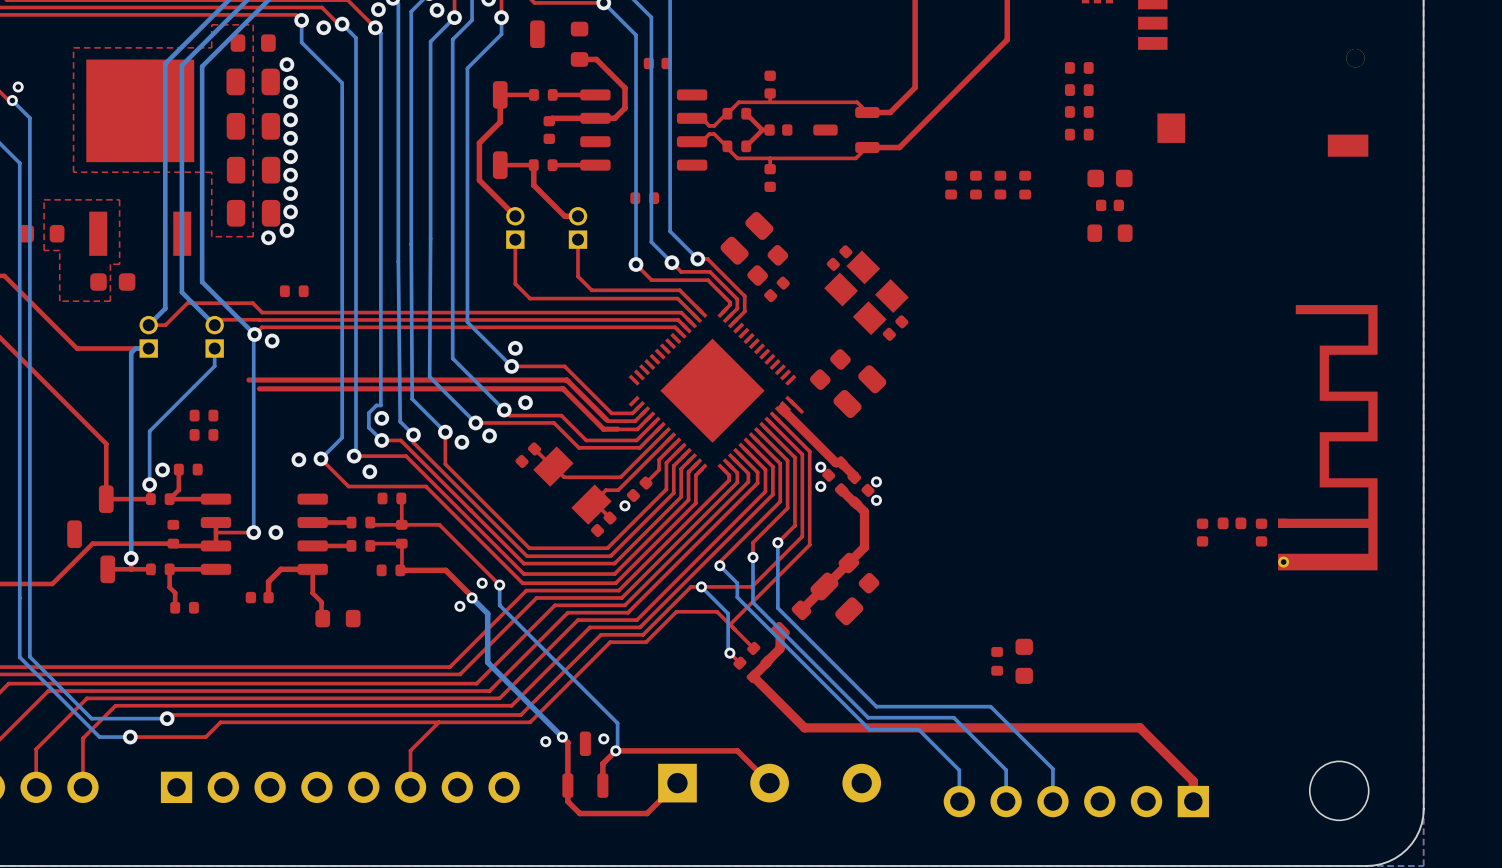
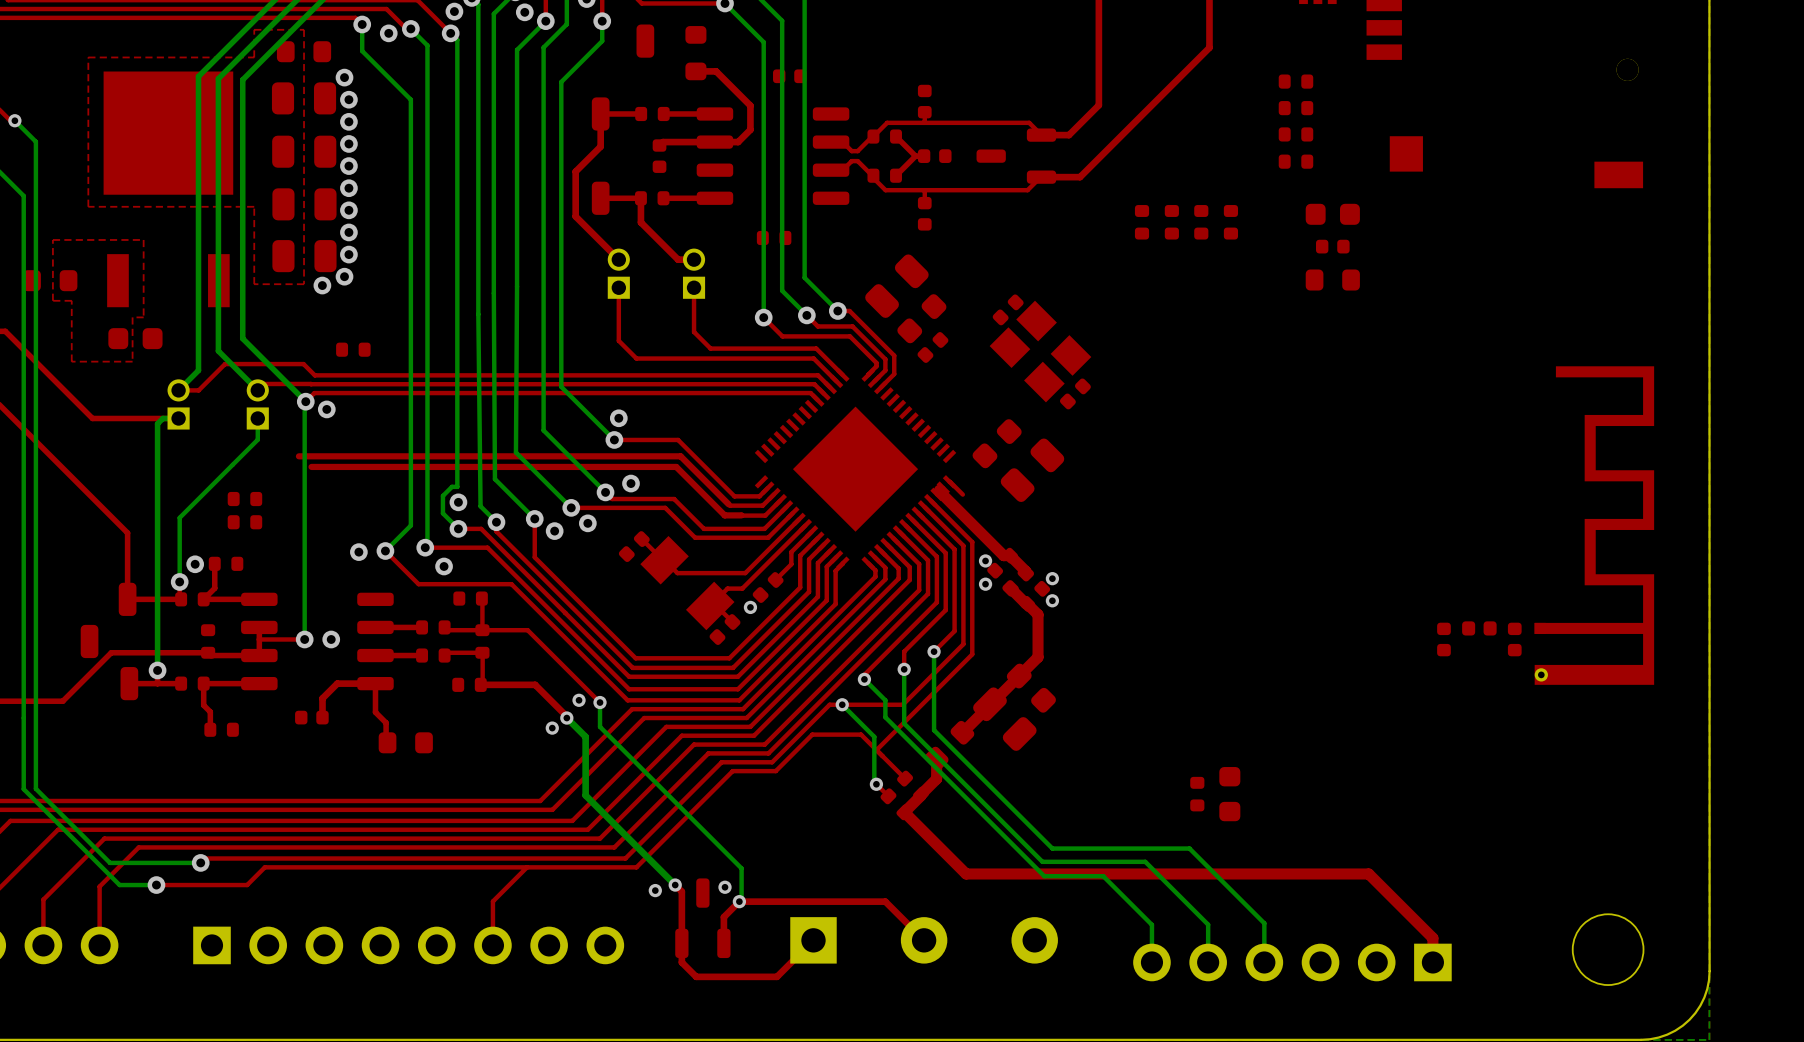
via: (18, 87) -> none

